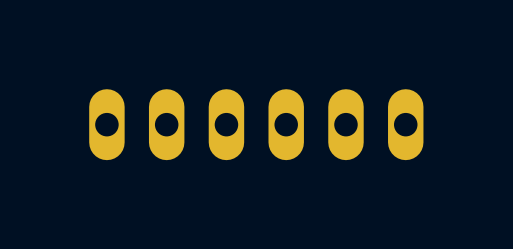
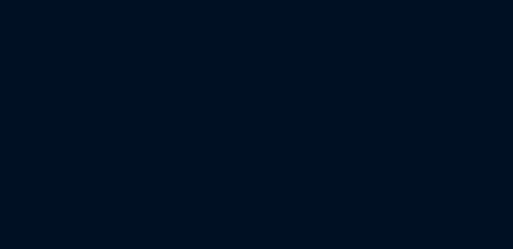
part: (256, 124) -> none

